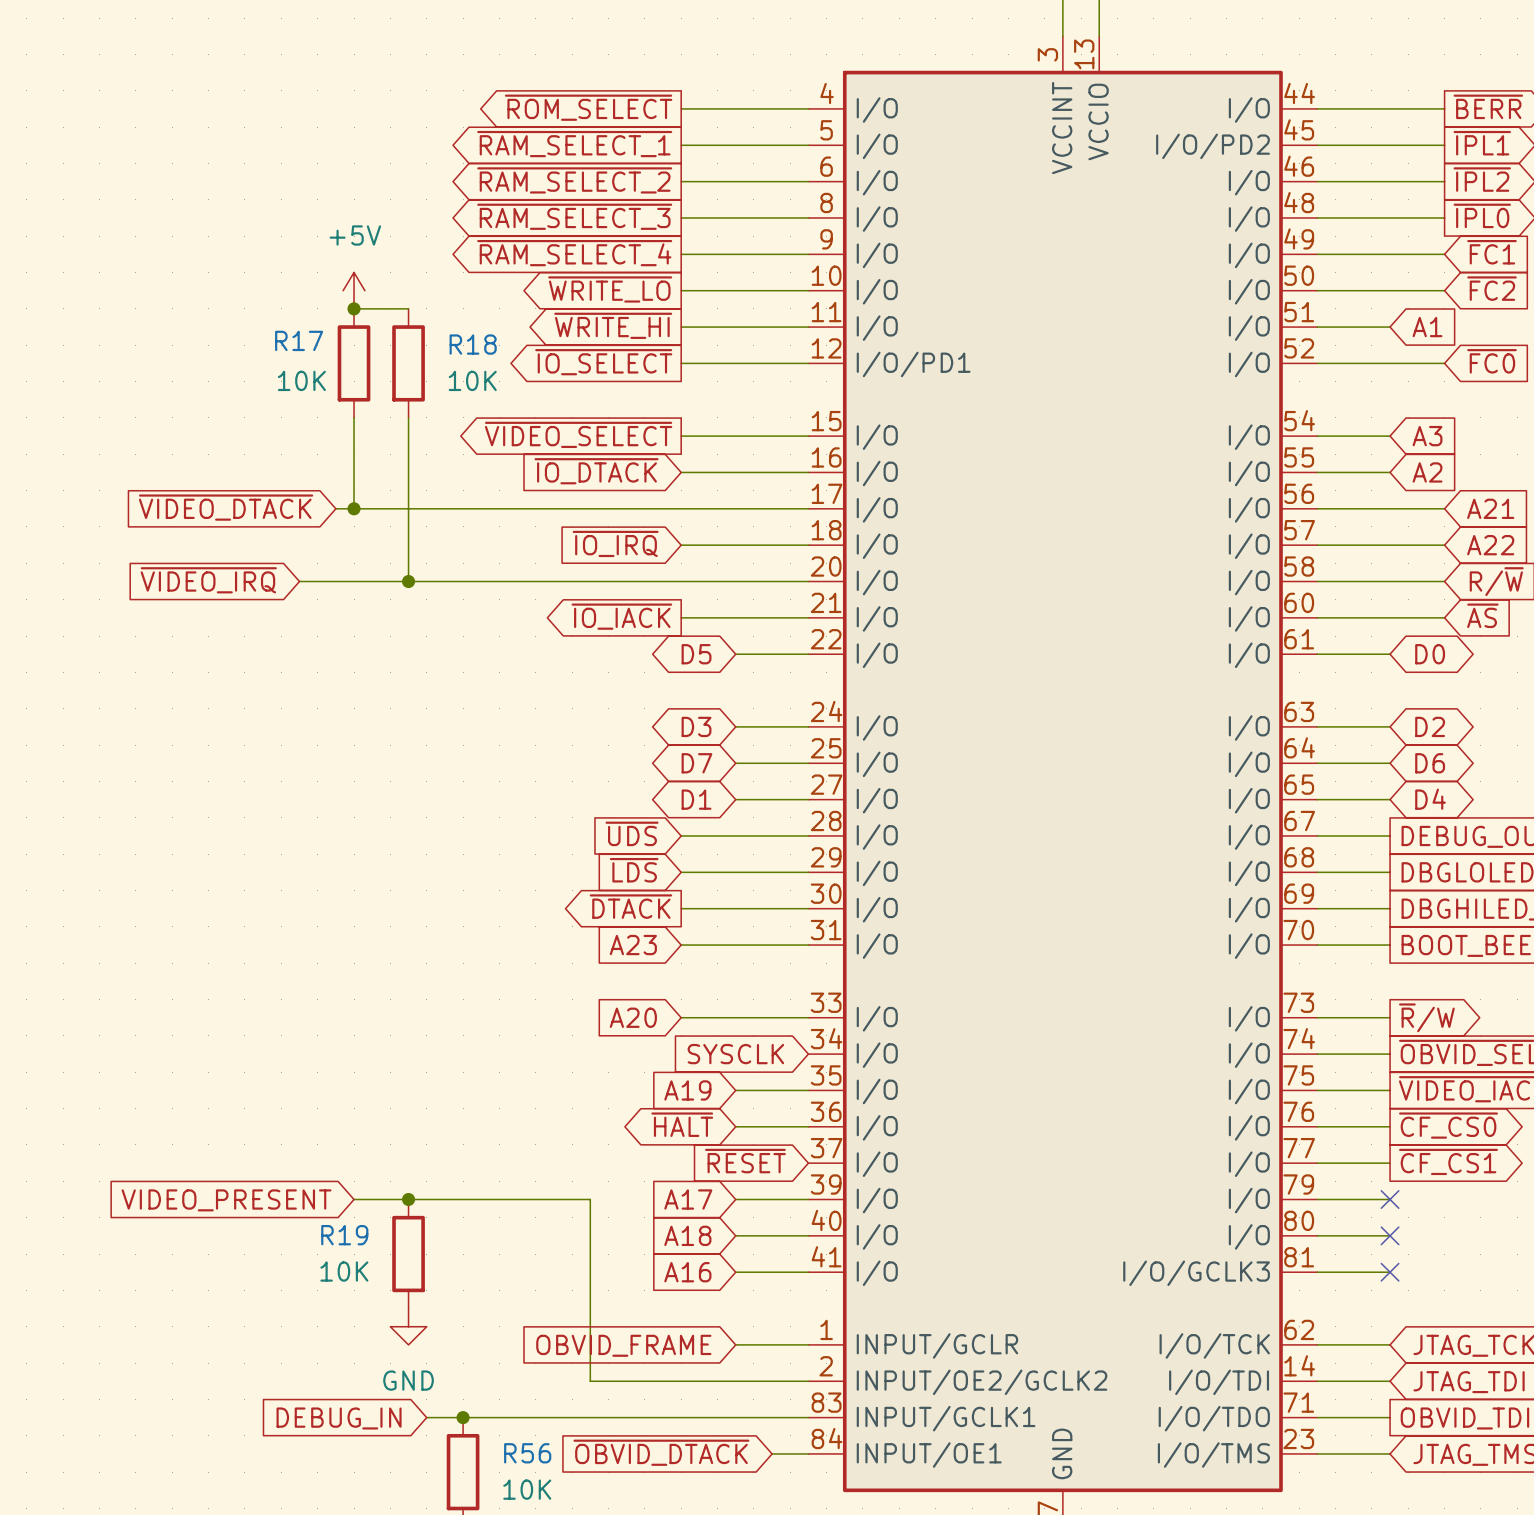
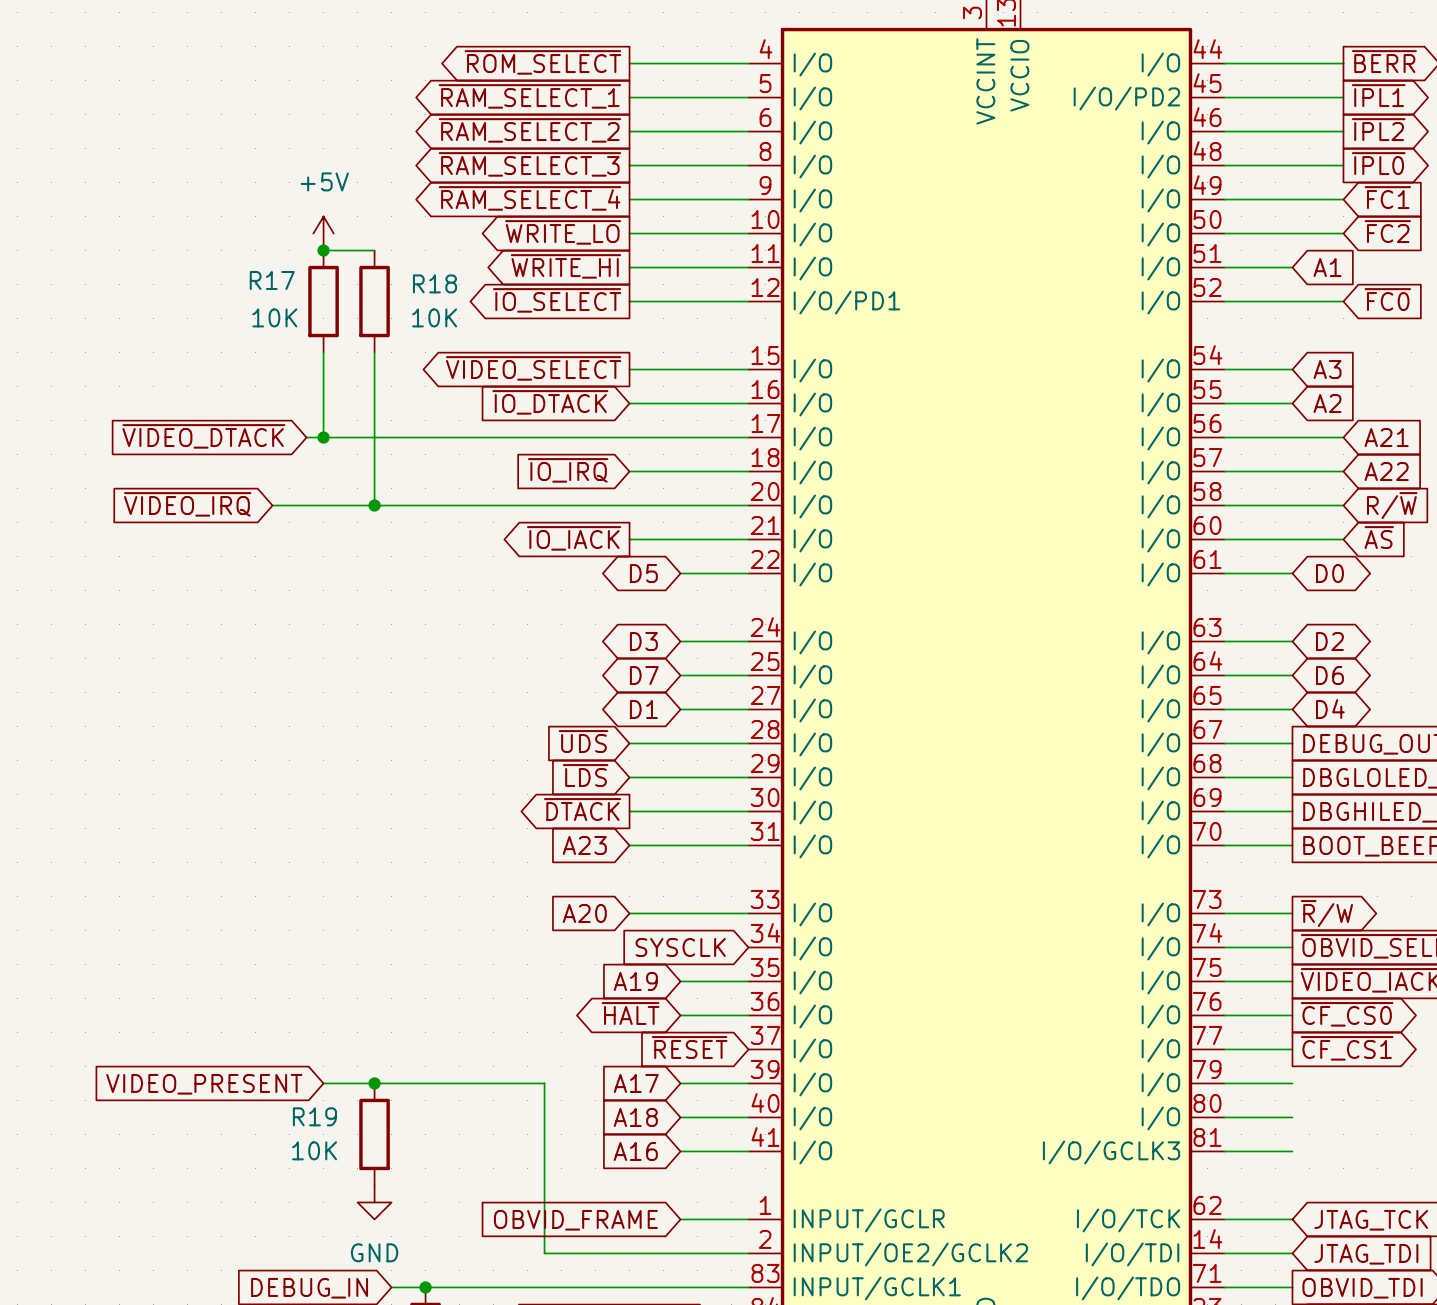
no-connect mark: (1390, 1199) -> none
no-connect mark: (1390, 1235) -> none
no-connect mark: (1390, 1272) -> none

